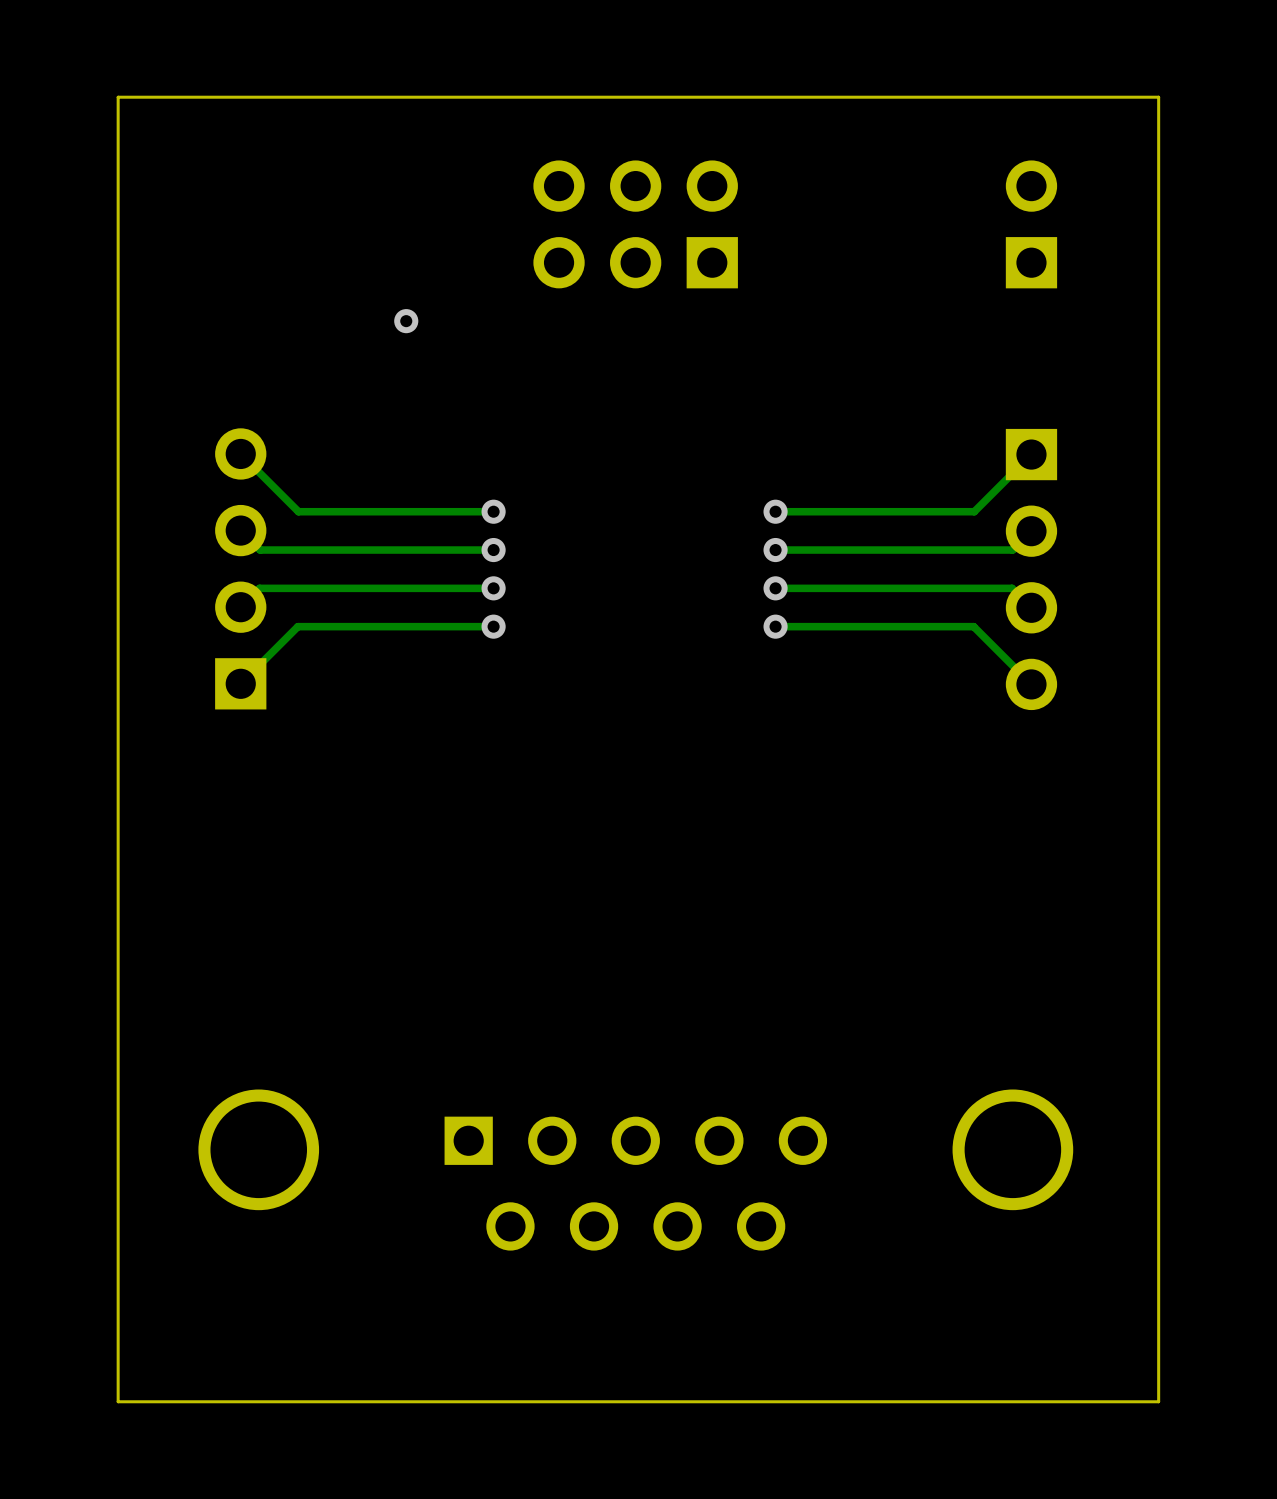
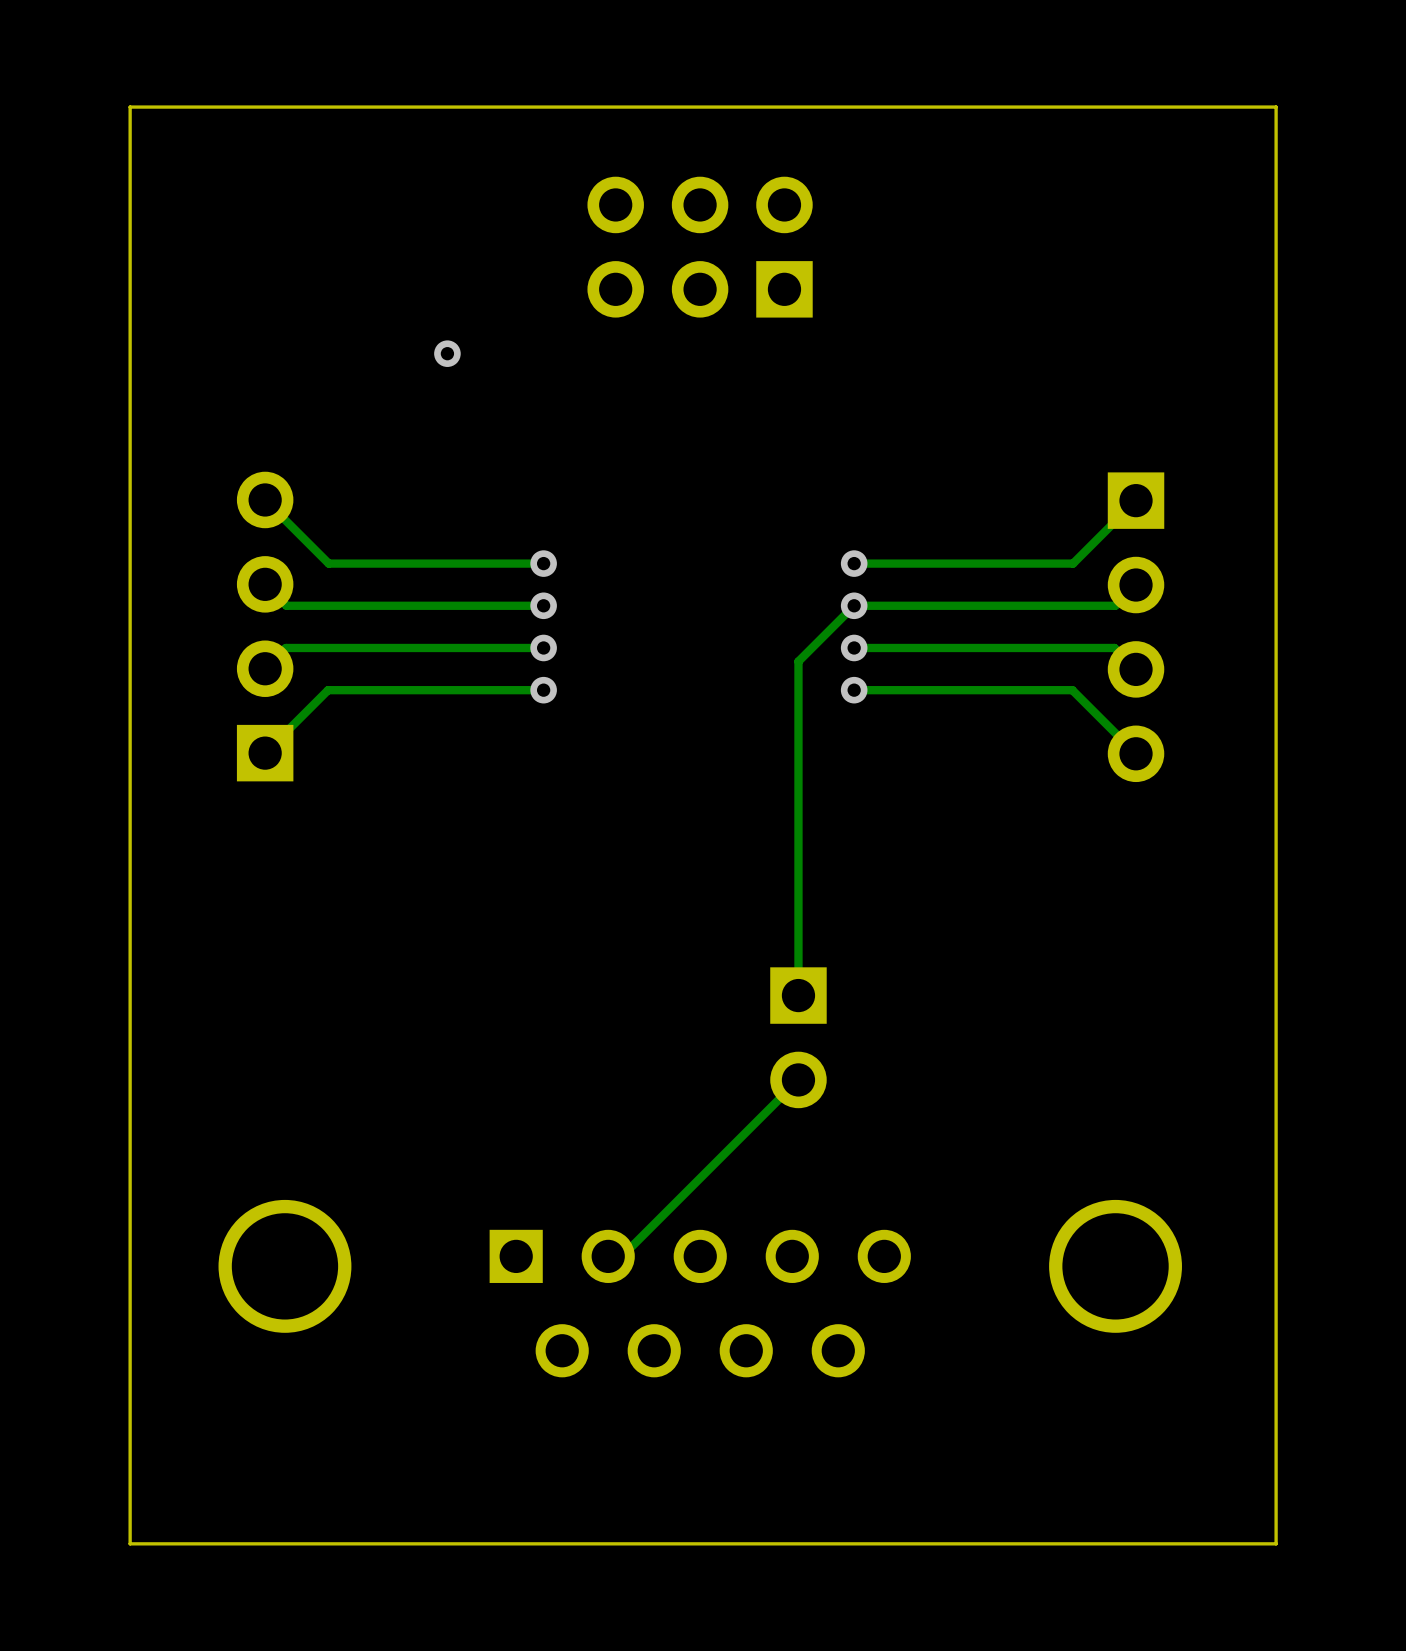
part: (1031, 224) -> none
track: none -> (854, 605) (798, 661) (798, 995)
part: none -> (798, 1037)
track: none -> (798, 1079) (622, 1256) (608, 1256)

